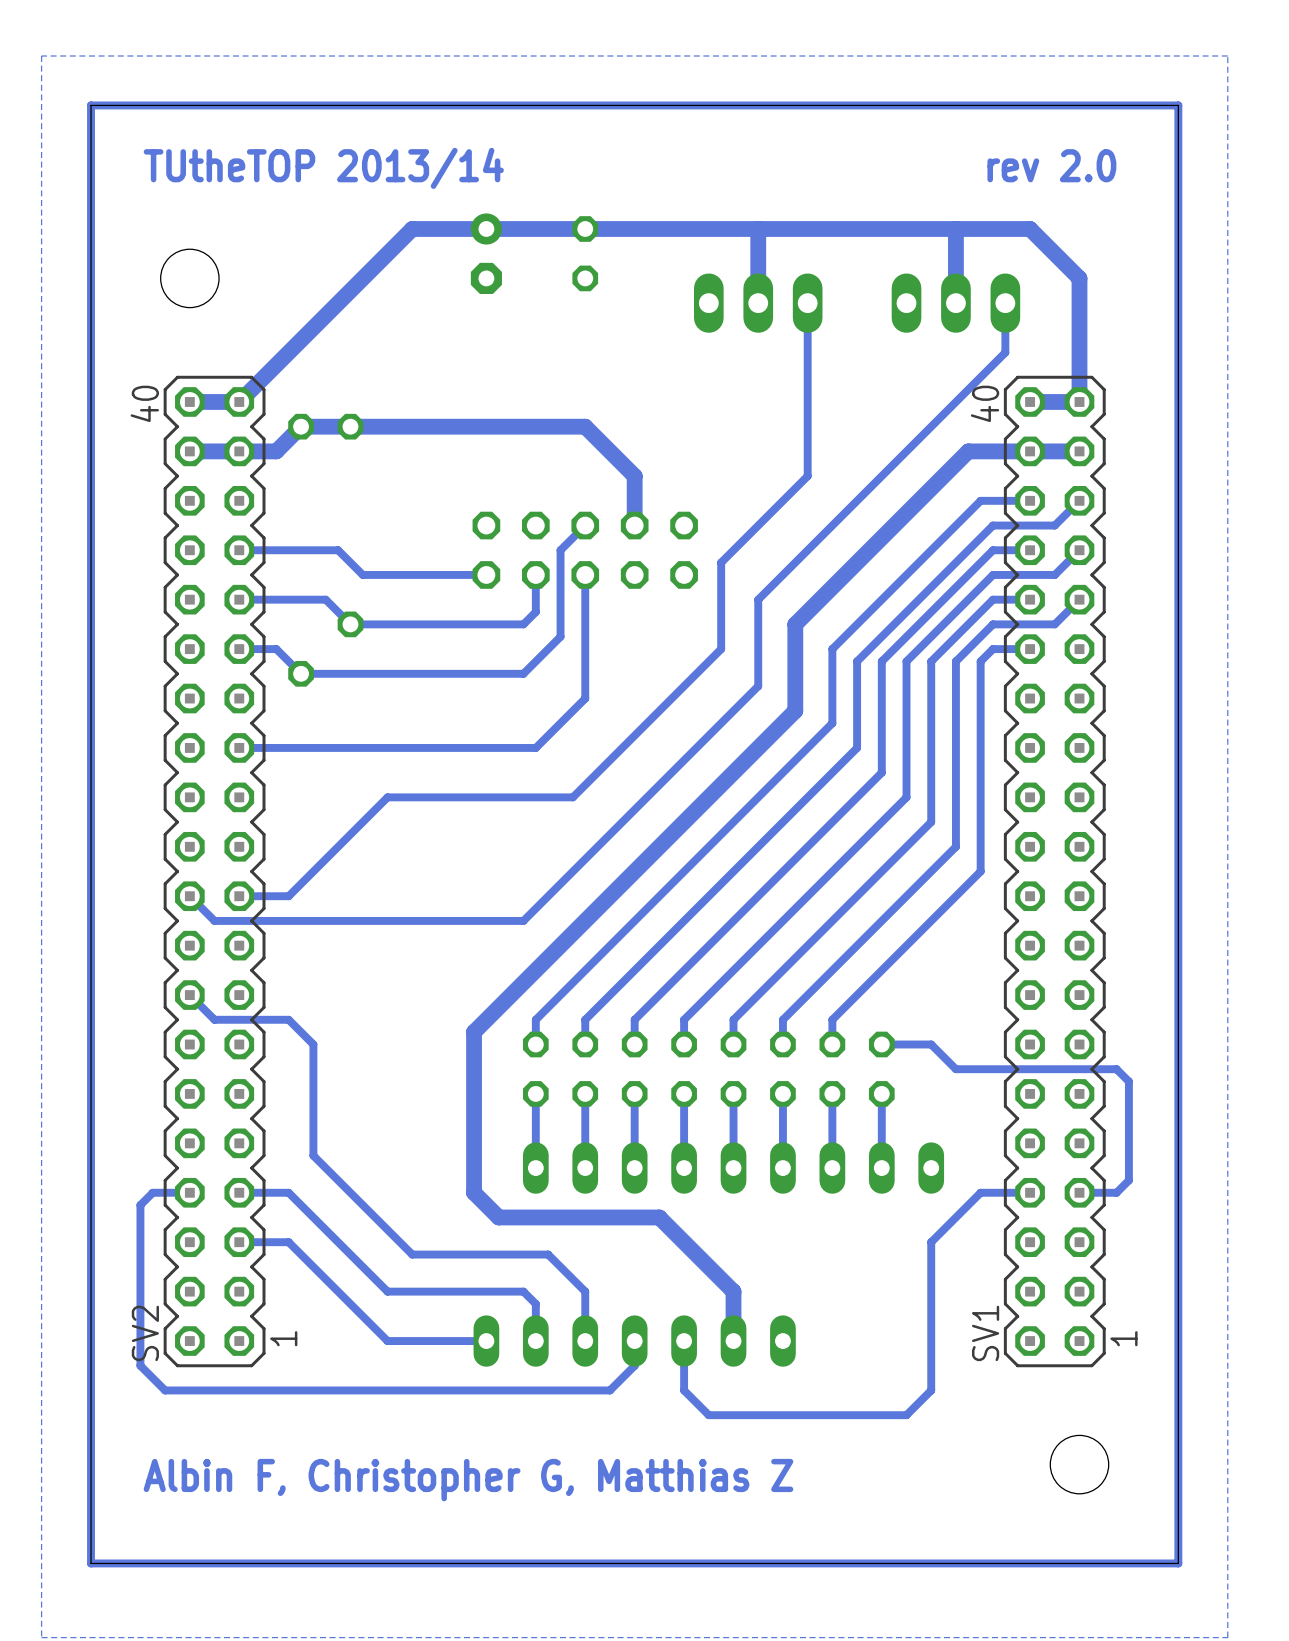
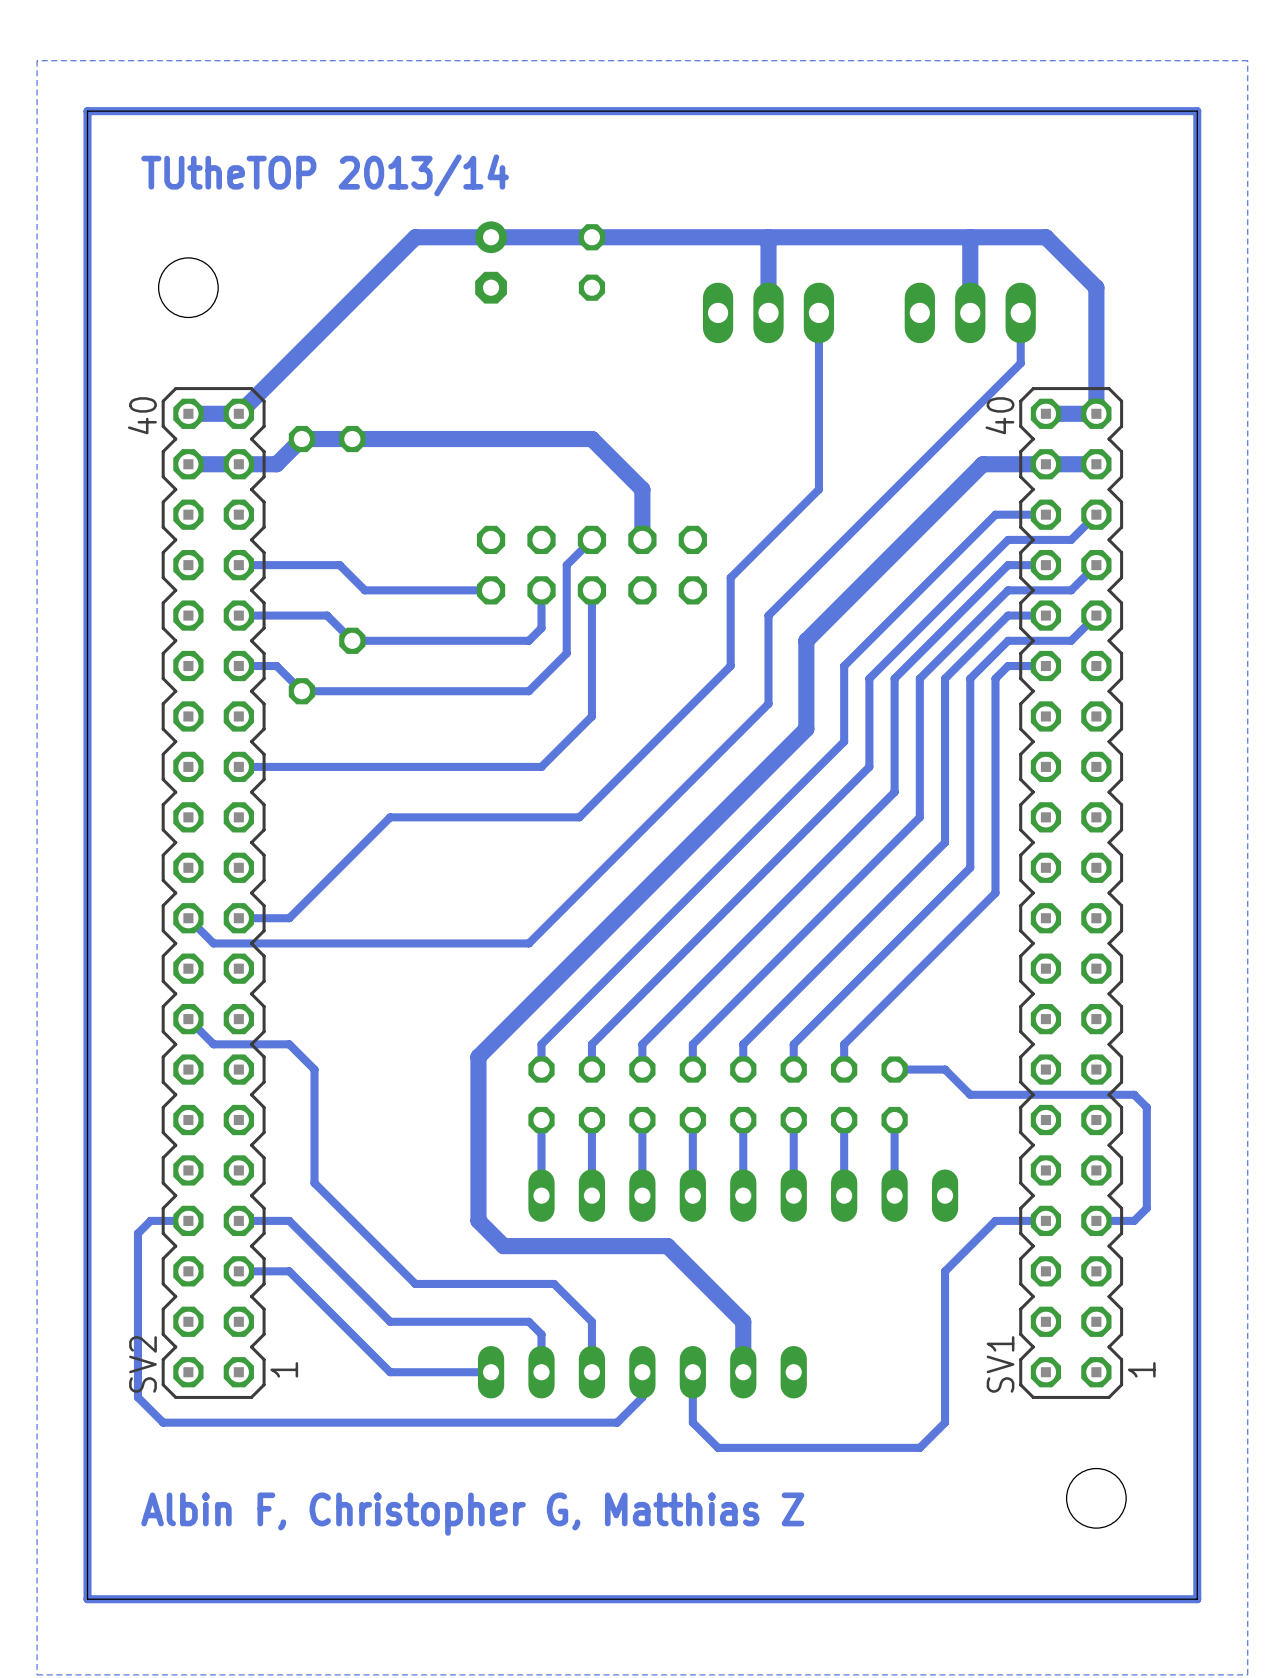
text: rev 2.0 (1051, 165) -> none

